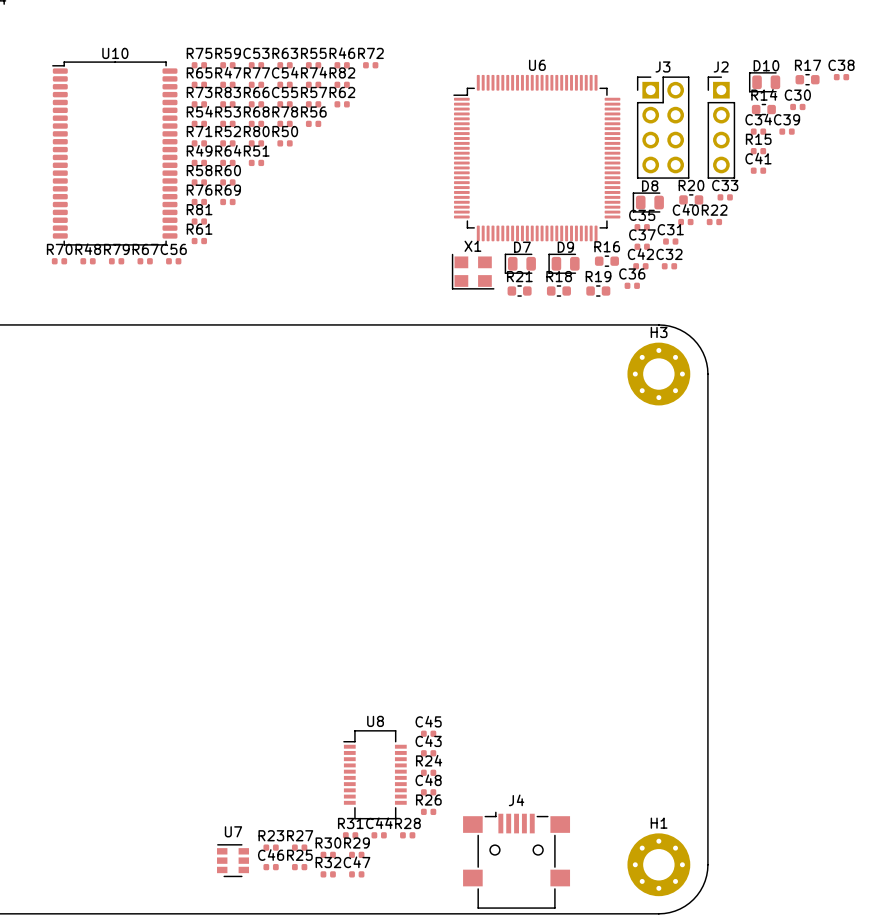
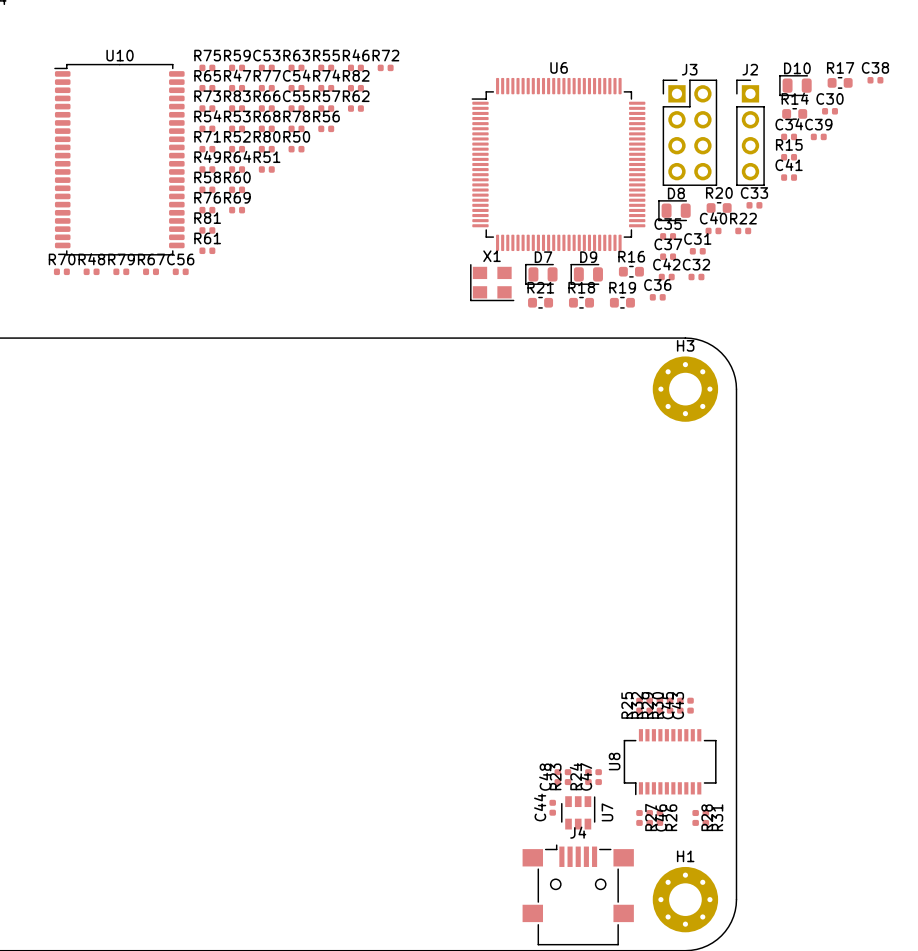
C45 rotation: 0° (428, 733) -> 90° clockwise (680, 705)
C45 position: (428, 733) -> (680, 705)
C43 rotation: 0° (428, 753) -> 90° clockwise (690, 705)
C43 position: (428, 753) -> (690, 705)
R24 rotation: 0° (428, 772) -> 90° clockwise (588, 777)
R24 position: (428, 772) -> (588, 777)
U8 rotation: 0° (374, 774) -> 90° counterclockwise (670, 762)
U8 position: (374, 774) -> (670, 762)
C48 rotation: 0° (428, 792) -> 90° clockwise (557, 777)
C48 position: (428, 792) -> (557, 777)
R26 rotation: 0° (428, 811) -> 90° clockwise (659, 817)
R26 position: (428, 811) -> (659, 817)
R31 rotation: 0° (350, 835) -> 90° clockwise (705, 817)
R31 position: (350, 835) -> (705, 817)
C44 rotation: 0° (379, 835) -> 90° clockwise (552, 807)
C44 position: (379, 835) -> (552, 807)
R28 rotation: 0° (407, 835) -> 90° clockwise (695, 817)
R28 position: (407, 835) -> (695, 817)
R23 rotation: 0° (271, 847) -> 90° clockwise (568, 777)
R23 position: (271, 847) -> (568, 777)
R27 rotation: 0° (299, 847) -> 90° clockwise (639, 817)
R27 position: (299, 847) -> (639, 817)
R30 rotation: 0° (328, 854) -> 90° clockwise (670, 705)
R30 position: (328, 854) -> (670, 705)
R29 rotation: 0° (356, 854) -> 90° clockwise (659, 705)
R29 position: (356, 854) -> (659, 705)
U7 rotation: 0° (233, 860) -> 90° clockwise (578, 812)
U7 position: (233, 860) -> (578, 812)
J4 position: (516, 860) -> (578, 894)
C46 rotation: 0° (271, 867) -> 90° clockwise (649, 817)
C46 position: (271, 867) -> (649, 817)
R25 rotation: 0° (299, 867) -> 90° clockwise (639, 705)
R25 position: (299, 867) -> (639, 705)
R32 rotation: 0° (328, 874) -> 90° clockwise (649, 705)
R32 position: (328, 874) -> (649, 705)
C47 rotation: 0° (356, 874) -> 90° clockwise (598, 777)
C47 position: (356, 874) -> (598, 777)

